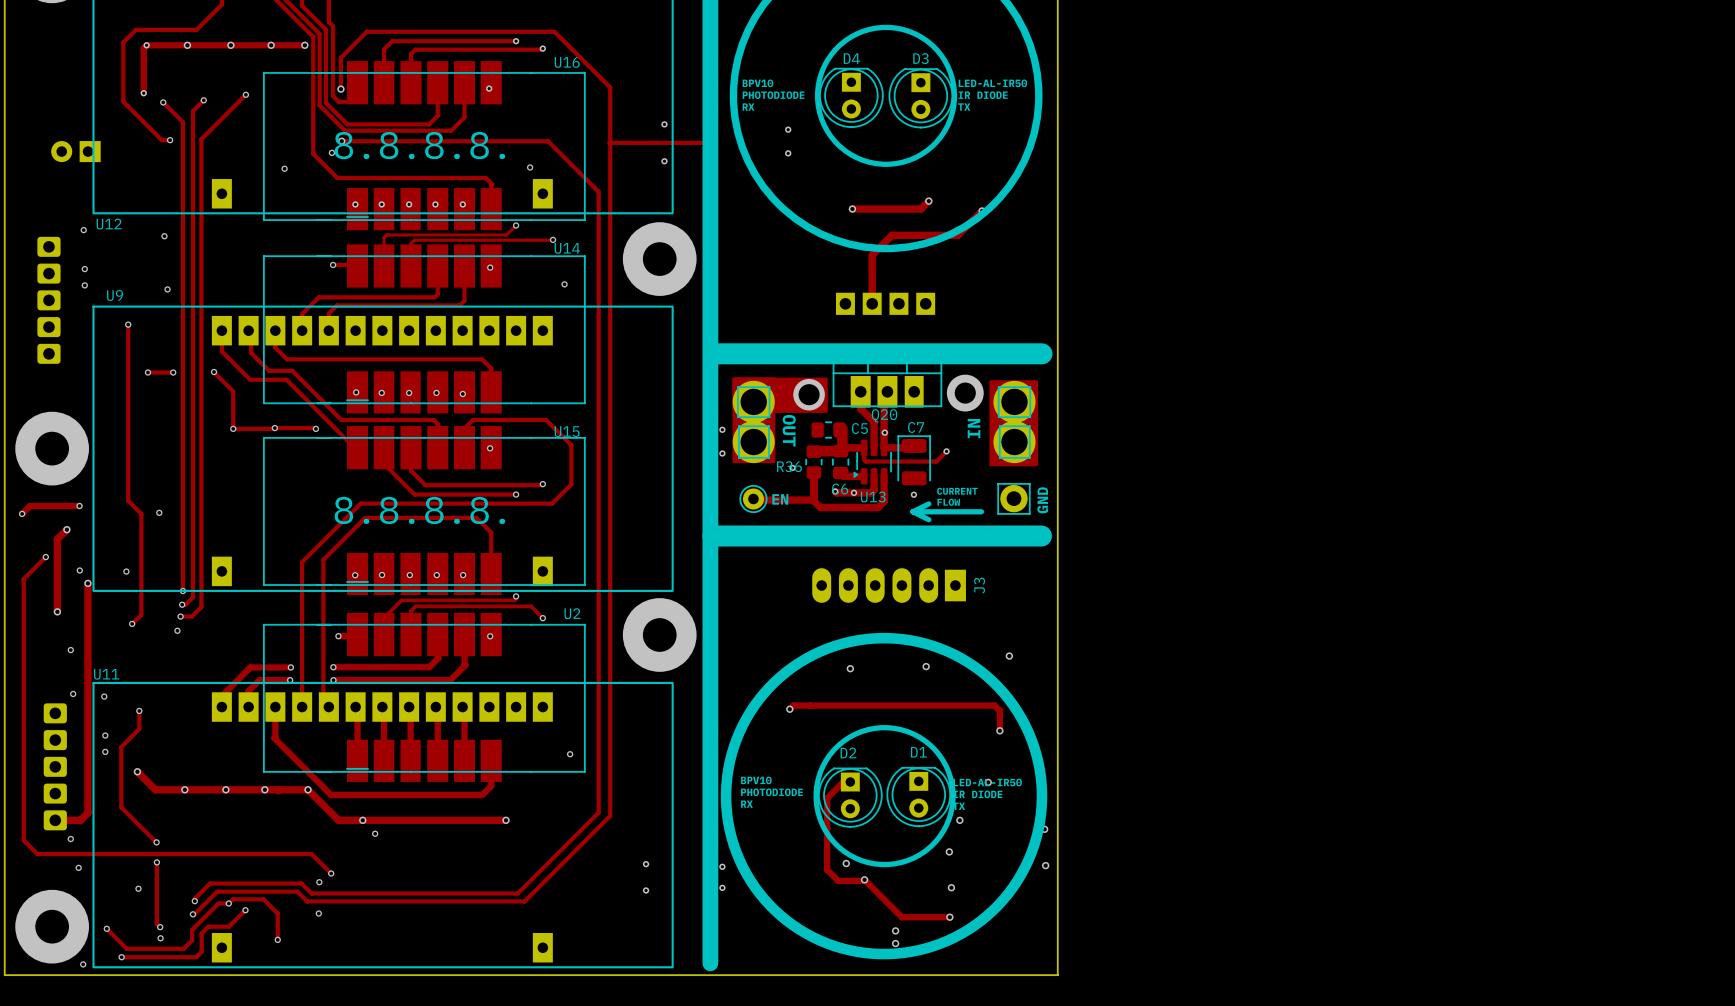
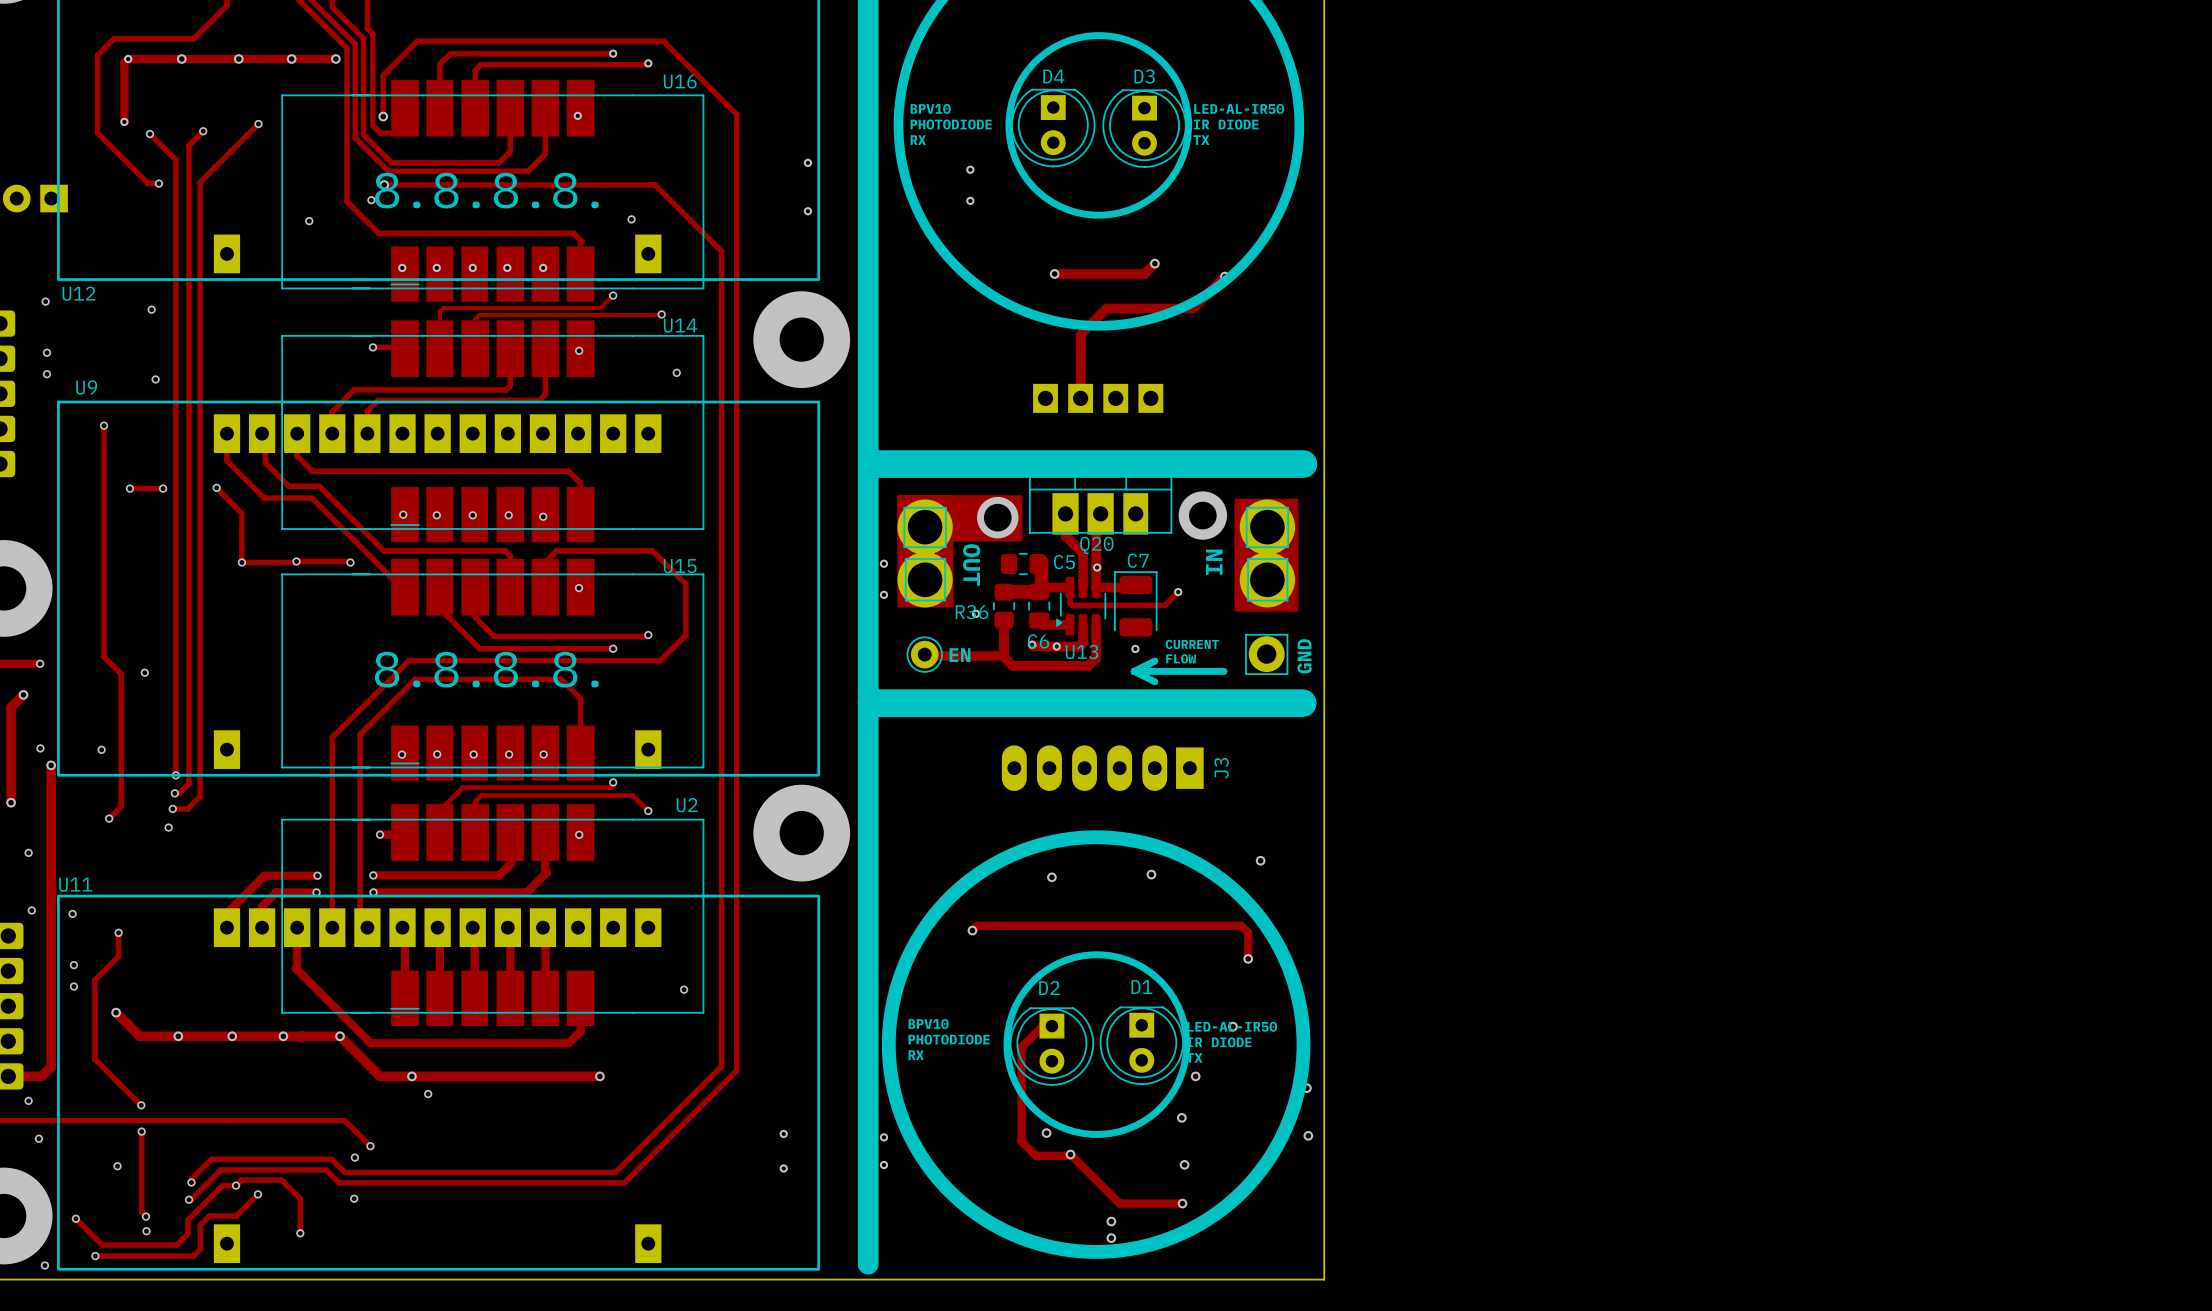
track: (609, 142) (709, 142) -> none

